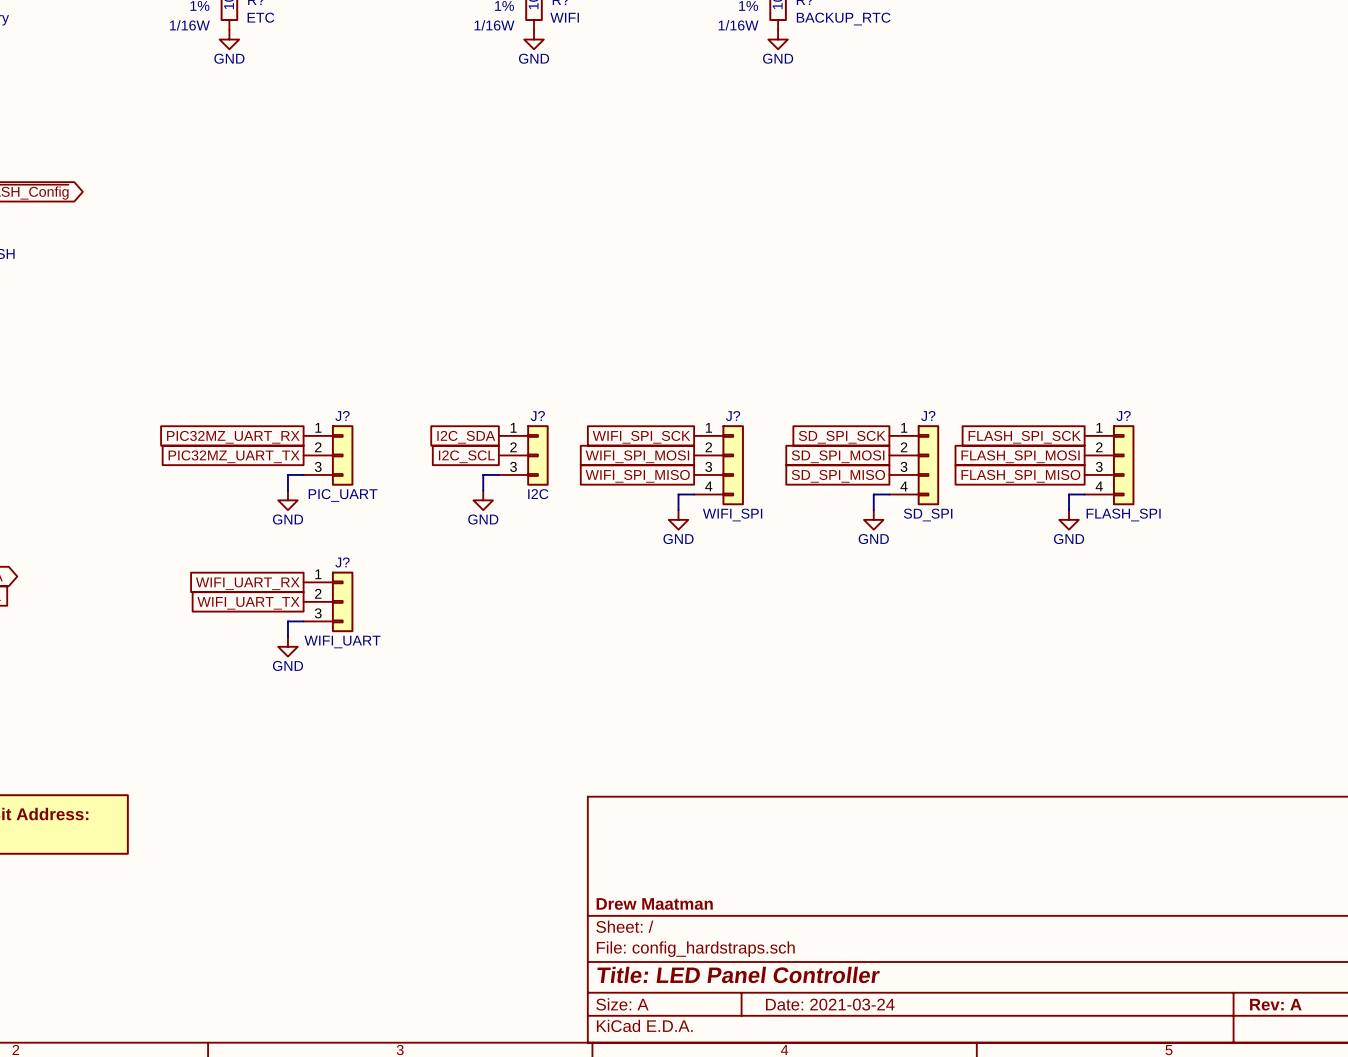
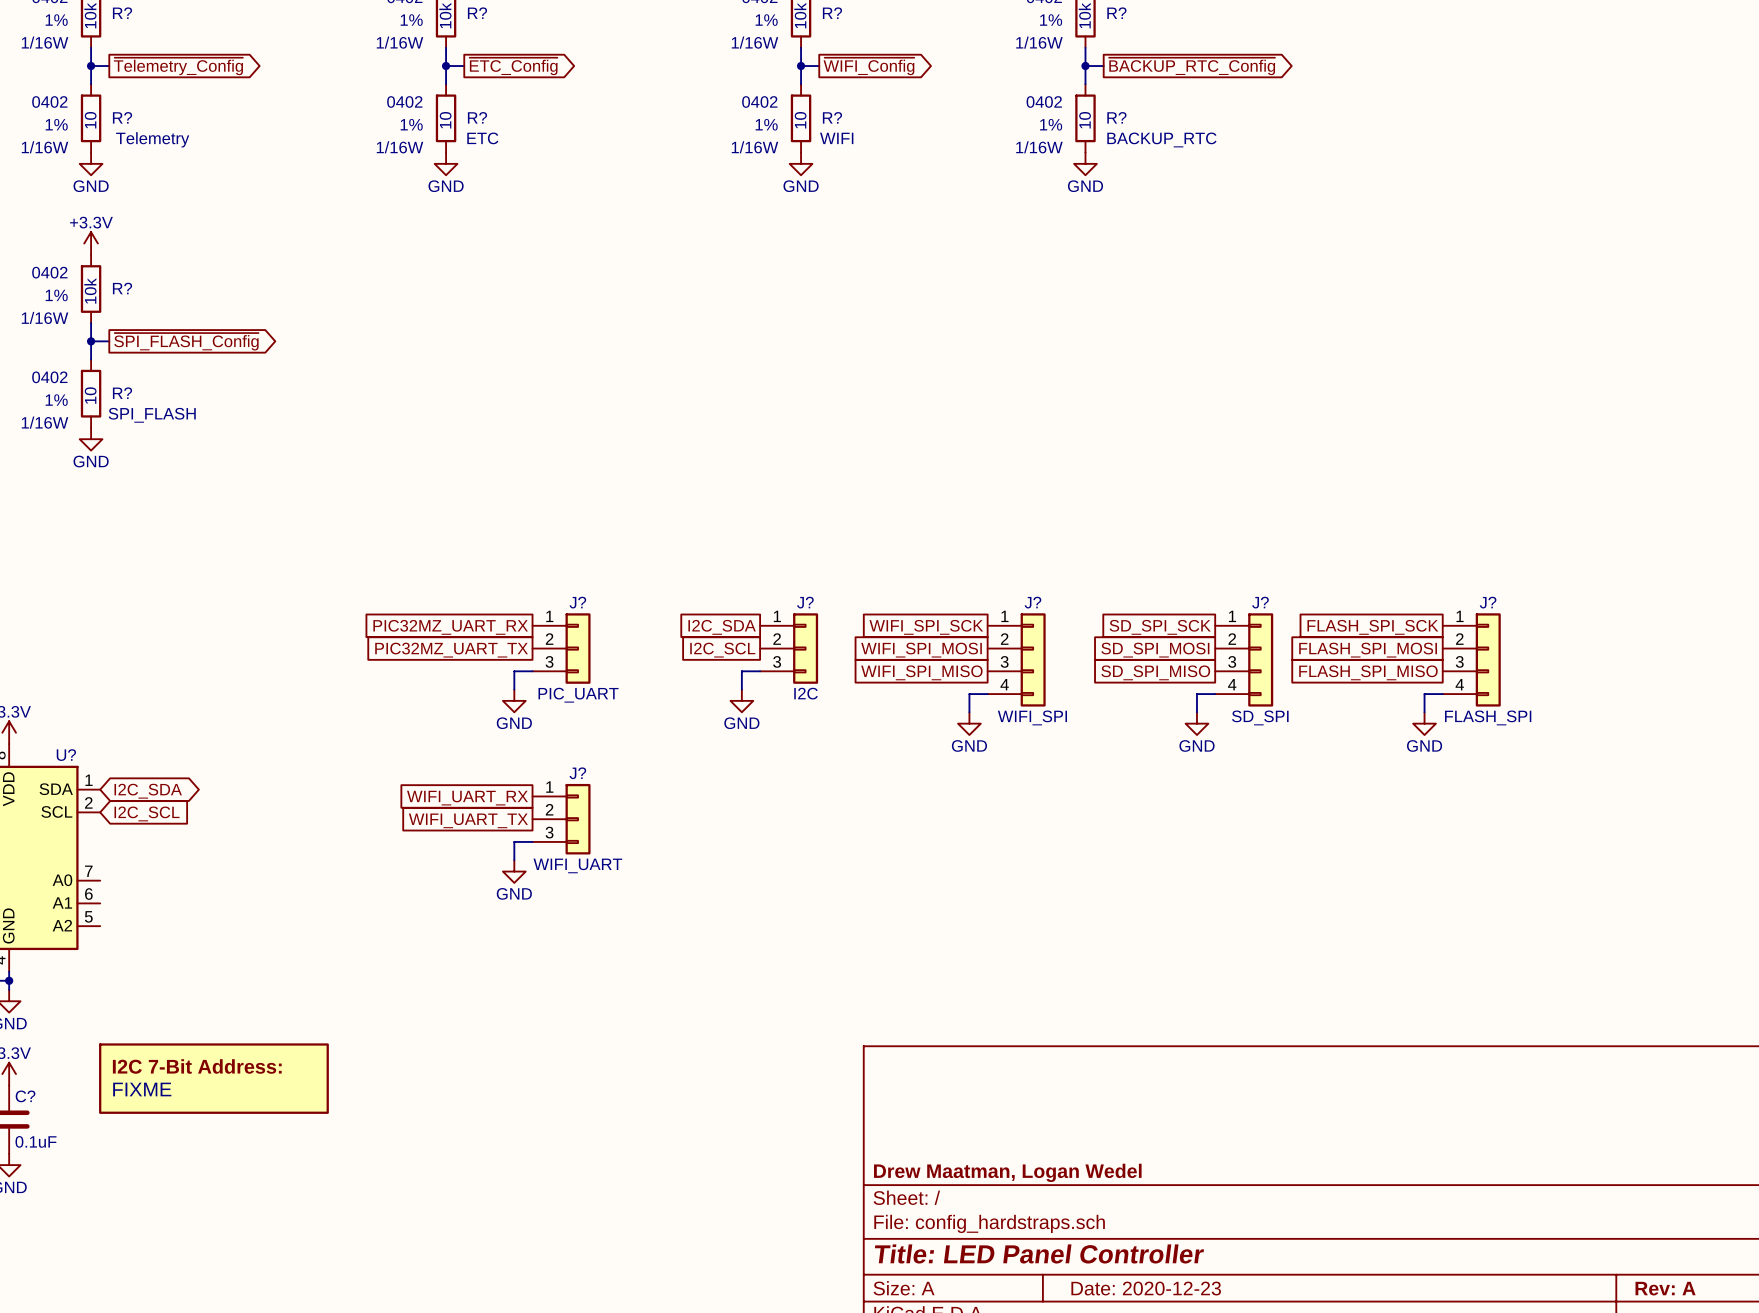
title block: Drew Maatman (654, 903) -> Drew Maatman, Logan Wedel (1007, 1172)
title block: Date: 2021-03-24 (830, 1004) -> Date: 2020-12-23 (1146, 1288)

